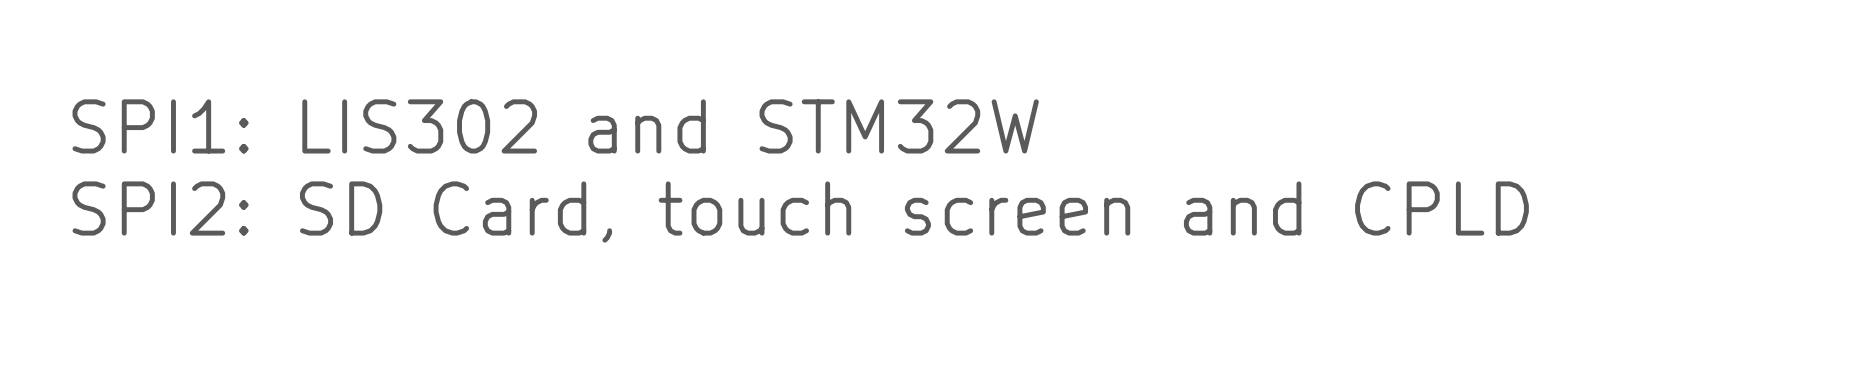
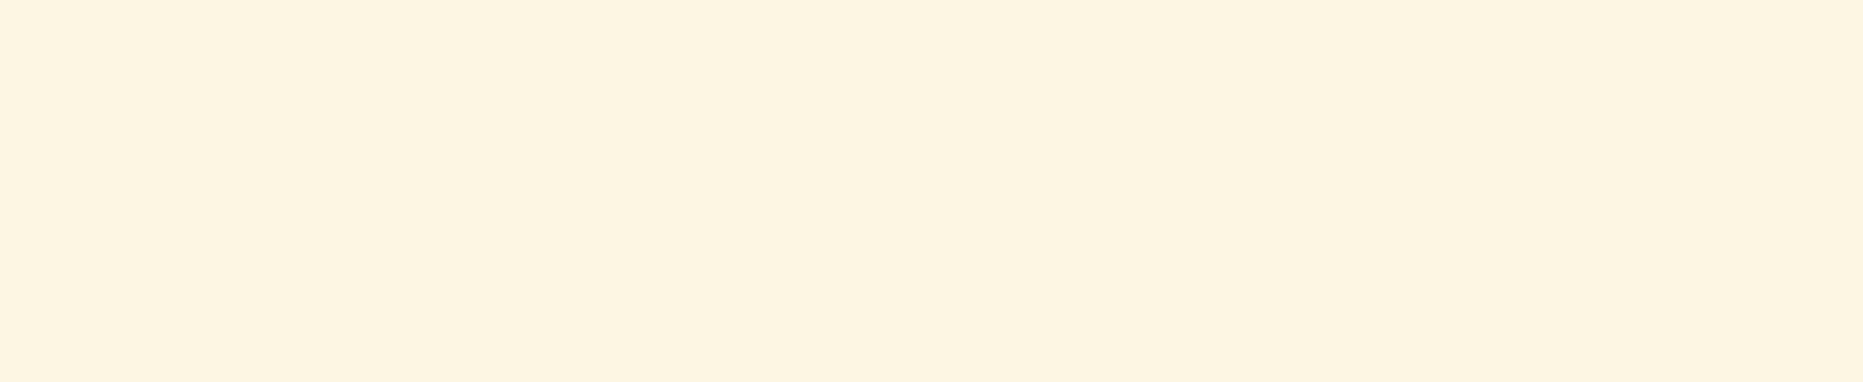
text: SPI1: LIS302 and STM32W (555, 126) -> none
text: SPI2: SD Card, touch screen and CPLD (800, 212) -> none

